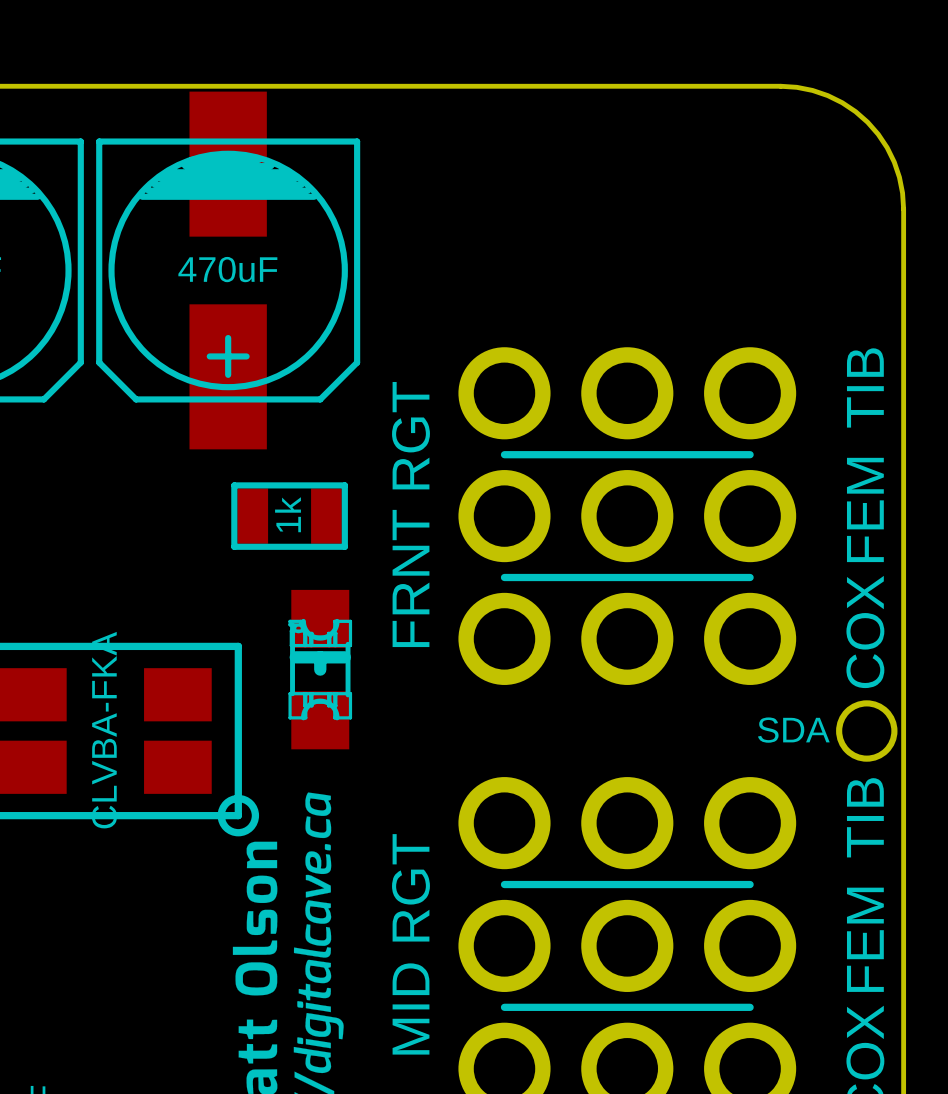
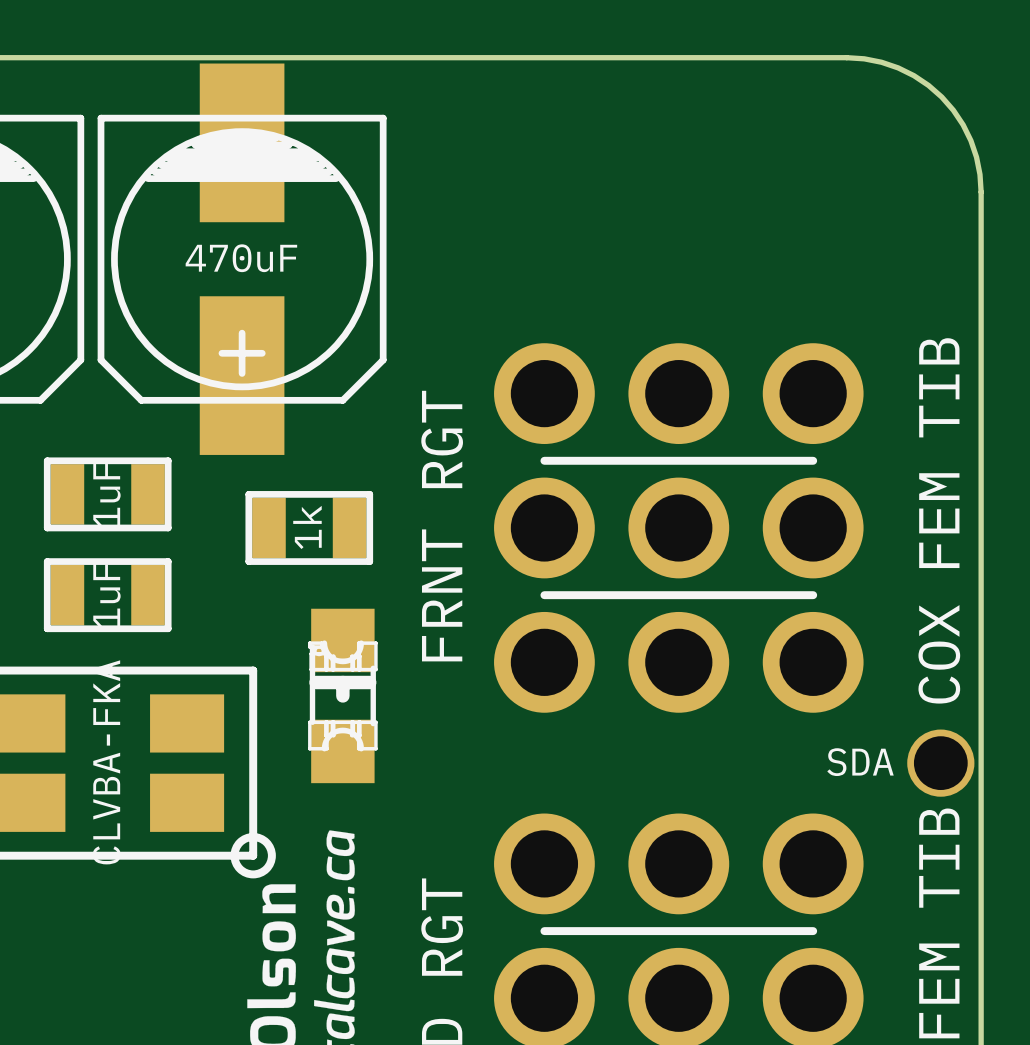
part: none -> 1uF (107, 494)
part: none -> 1uF (107, 595)

